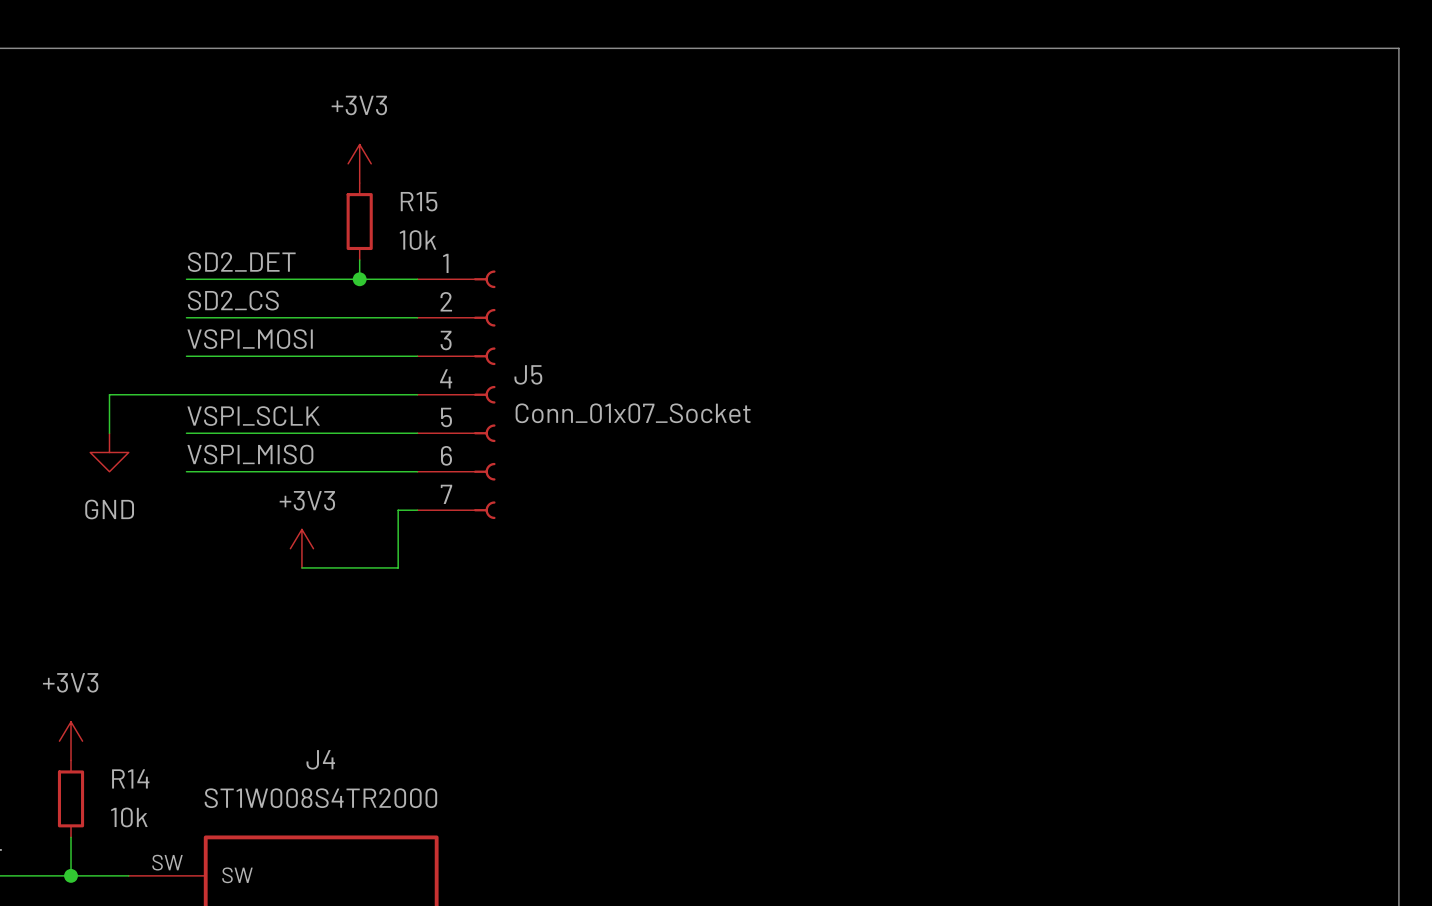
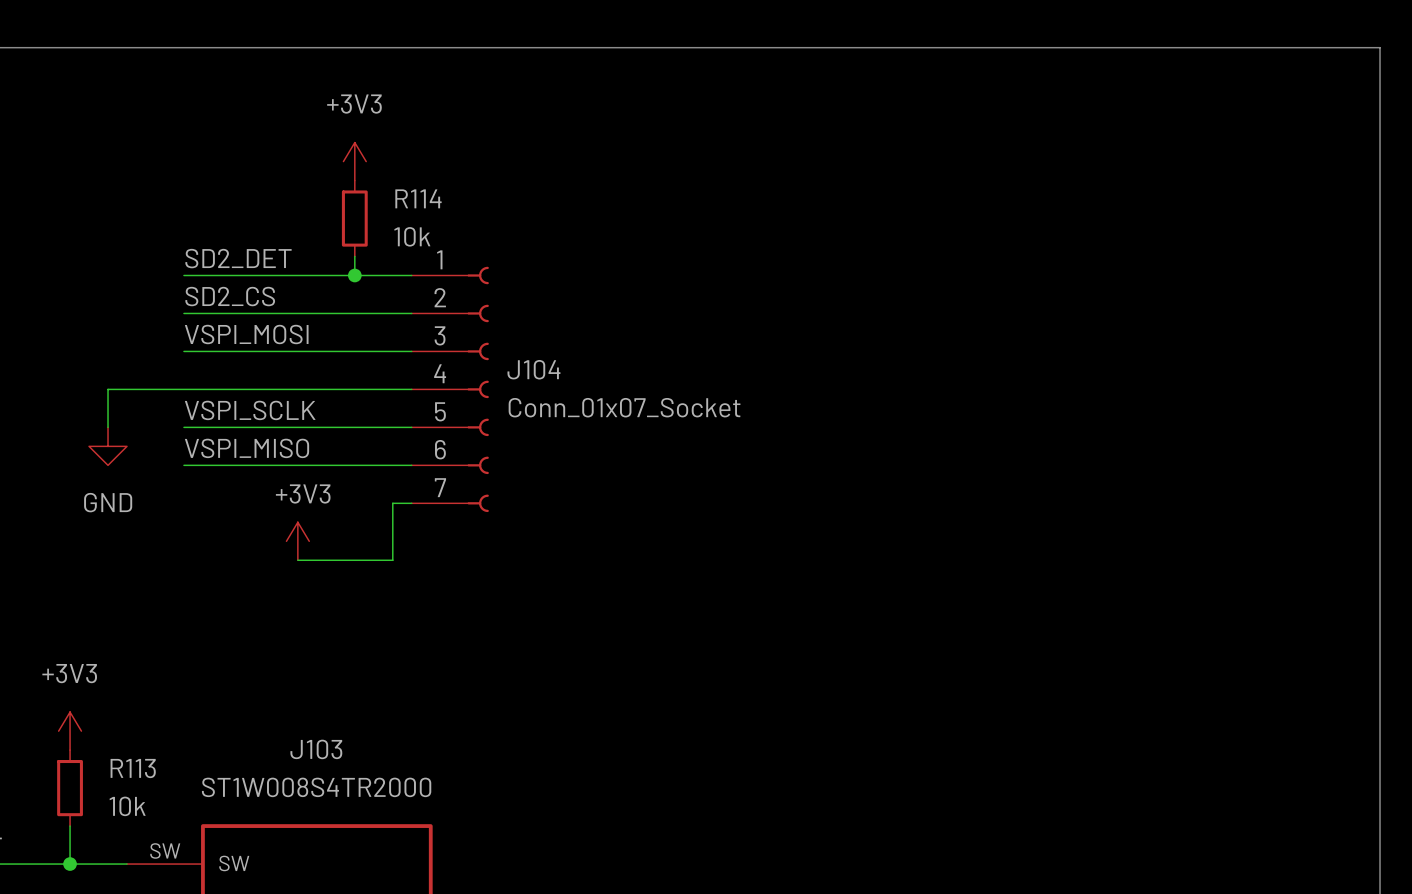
R15 name: R15 (419, 201) -> R114 (418, 198)
J5 name: J5 (528, 374) -> J104 (533, 369)
J4 name: J4 (320, 759) -> J103 (316, 749)
R14 name: R14 (130, 778) -> R113 (133, 768)

